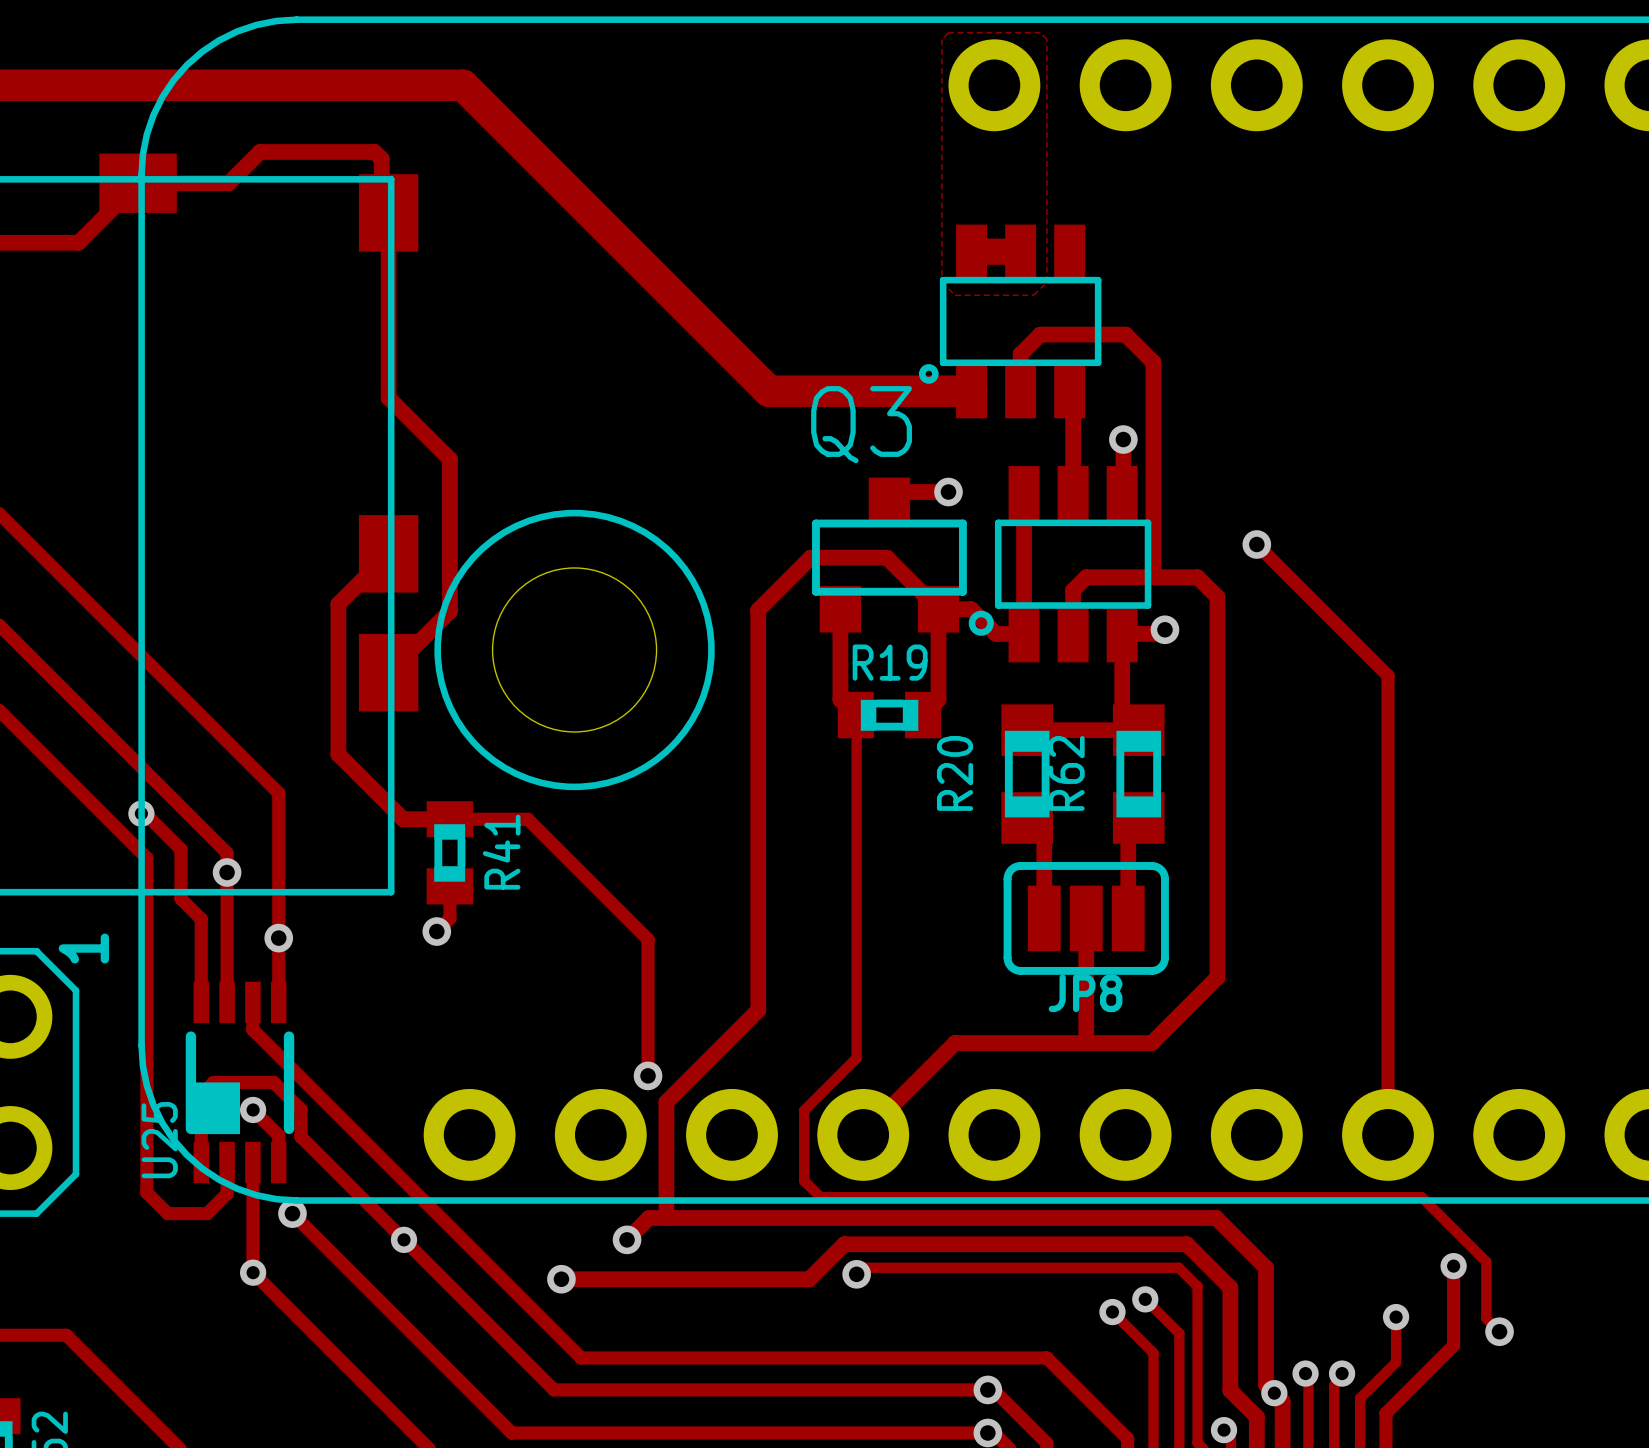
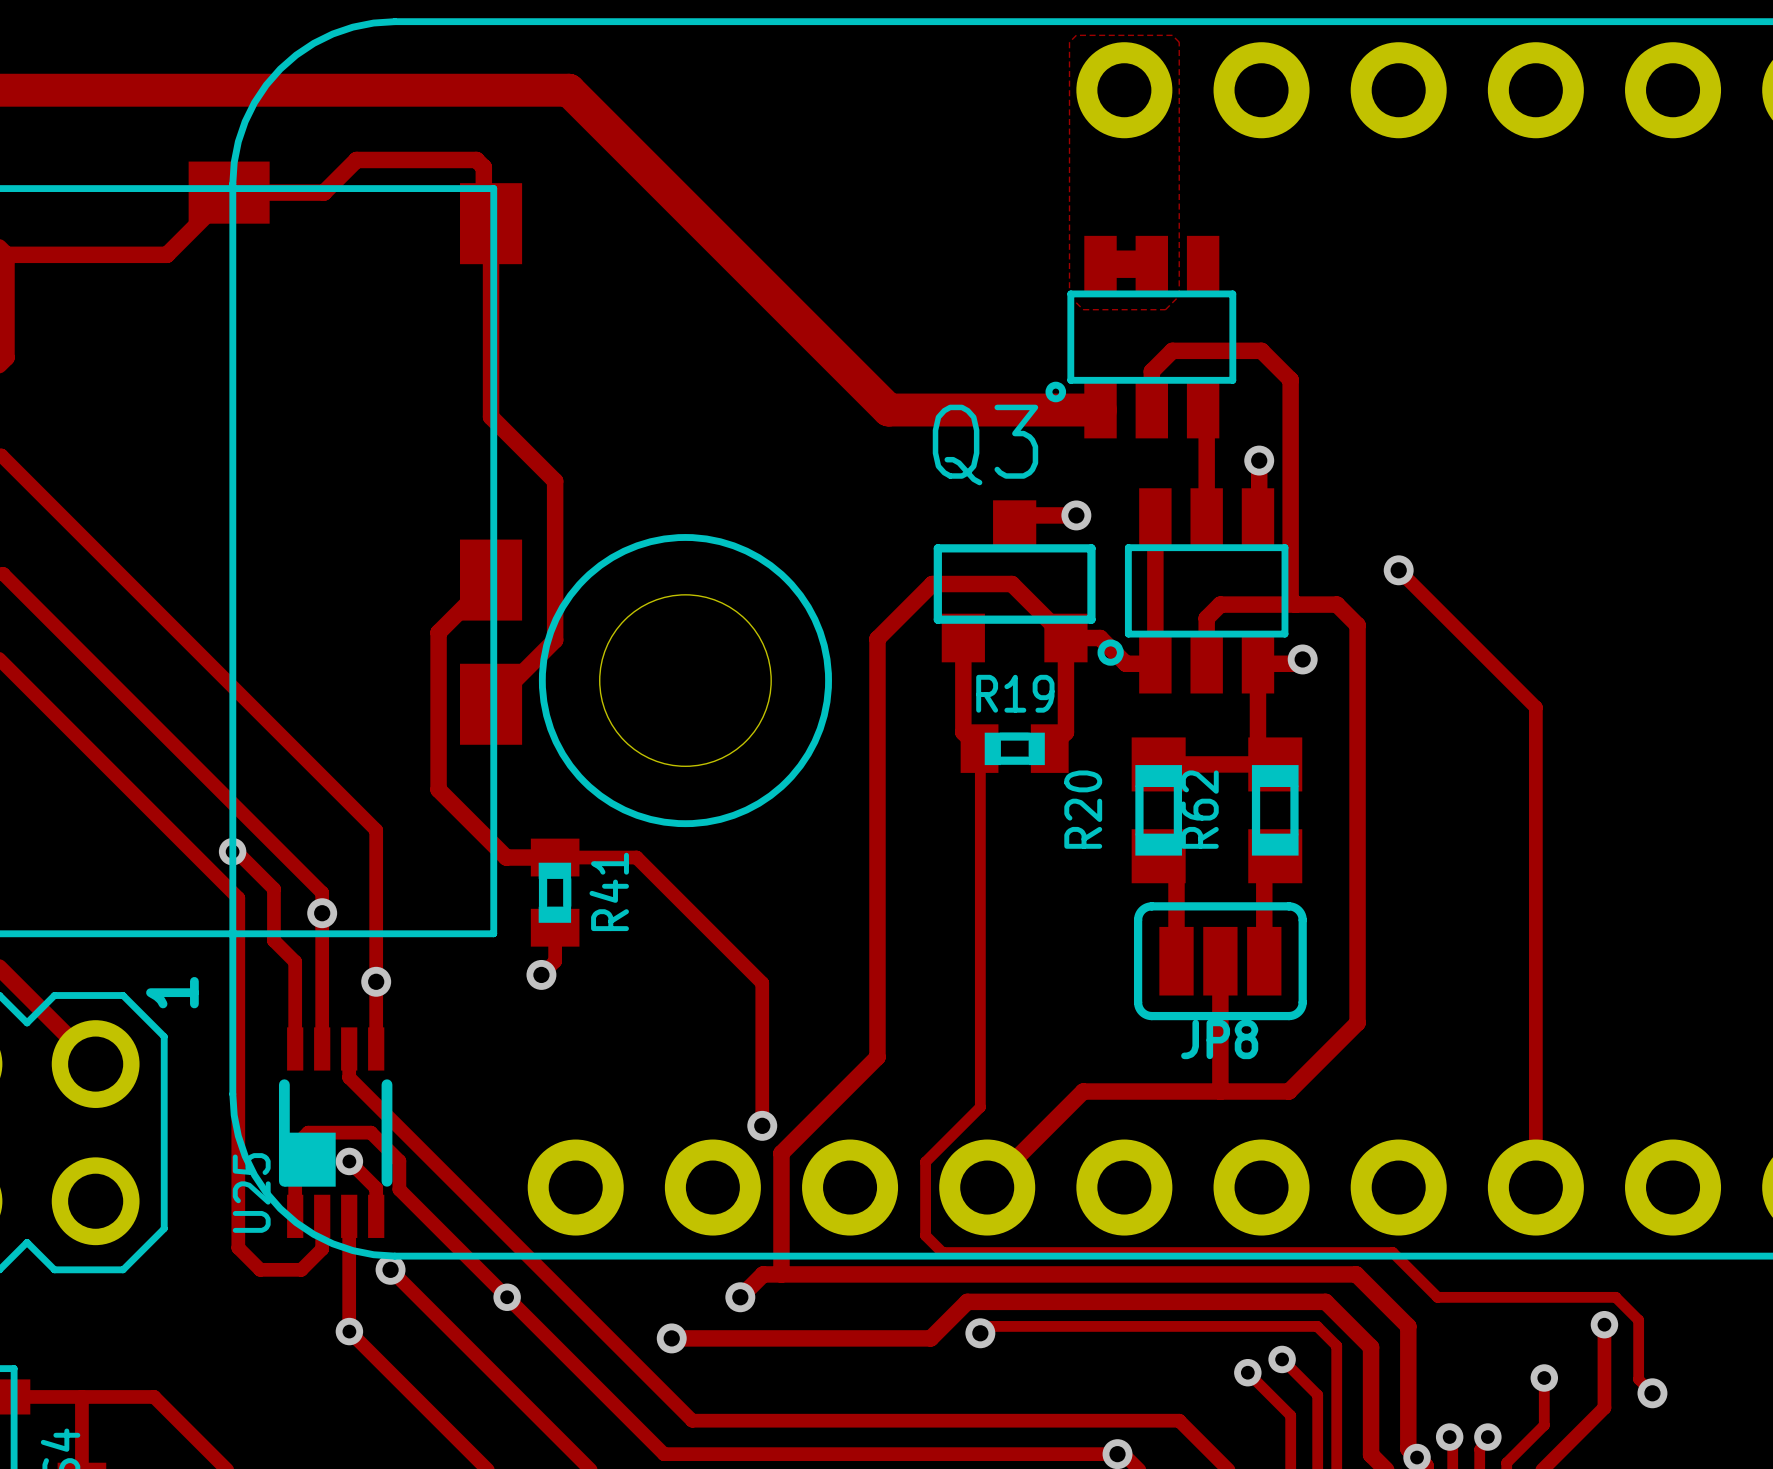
track: (1251, 1197) (1421, 1197) (1464, 1239) -> (1392, 1252) (1437, 1297) (1615, 1297)

